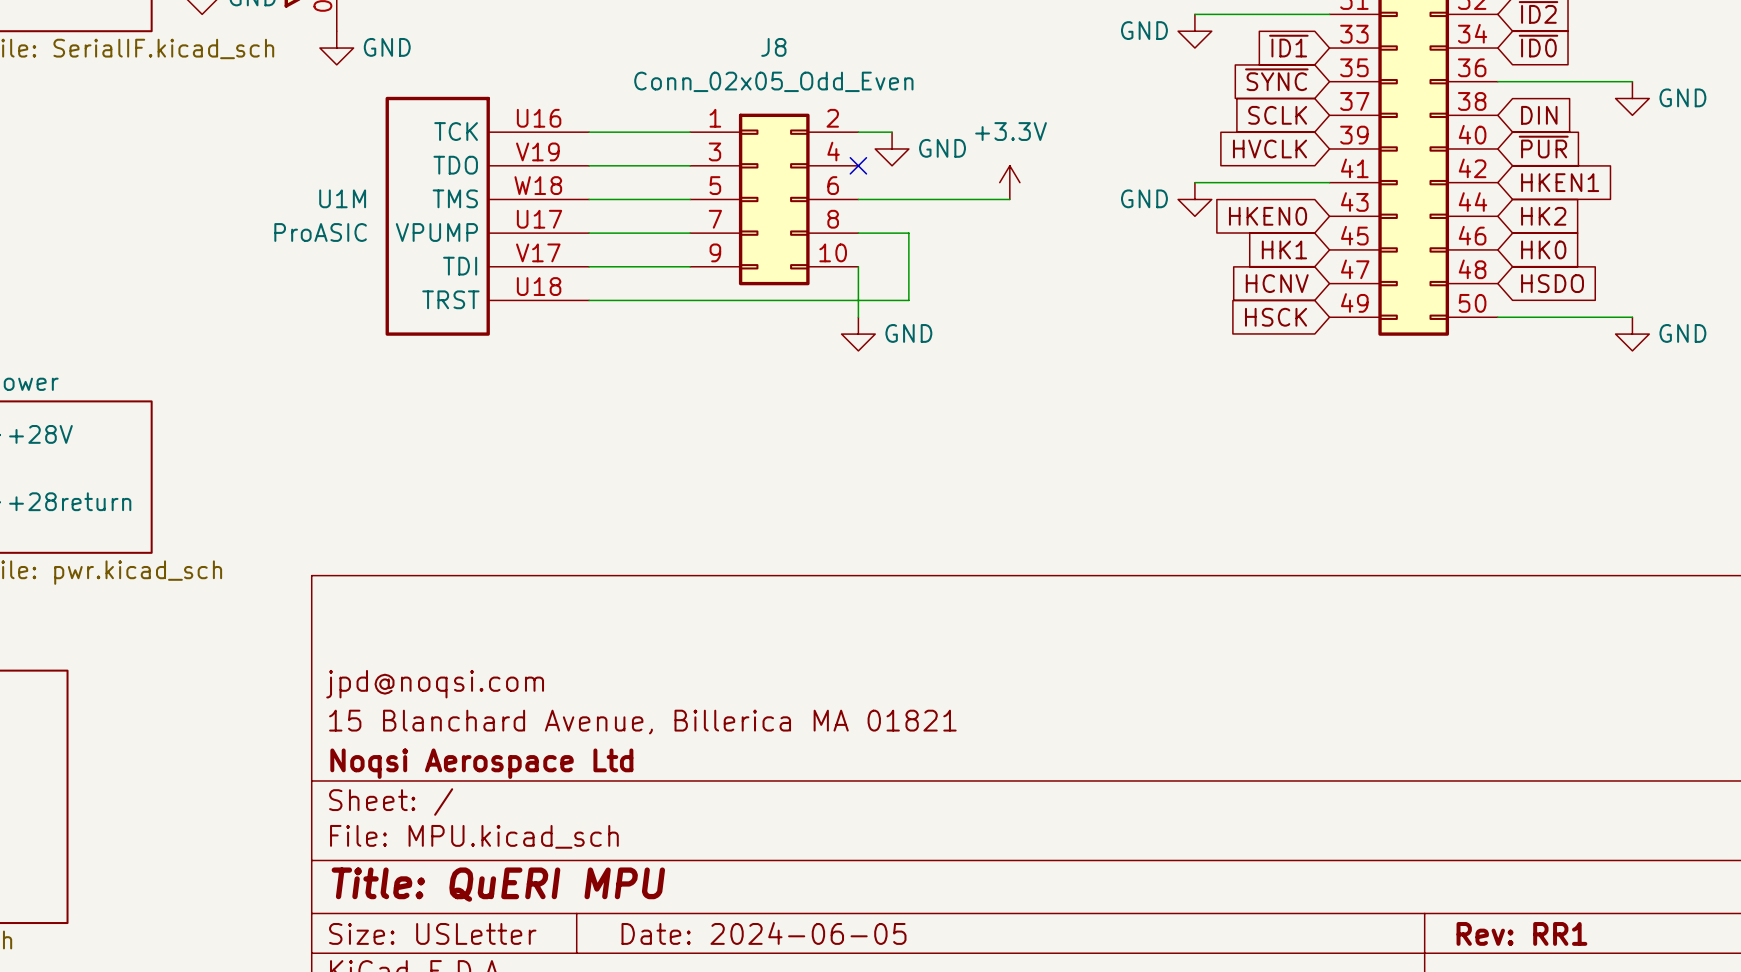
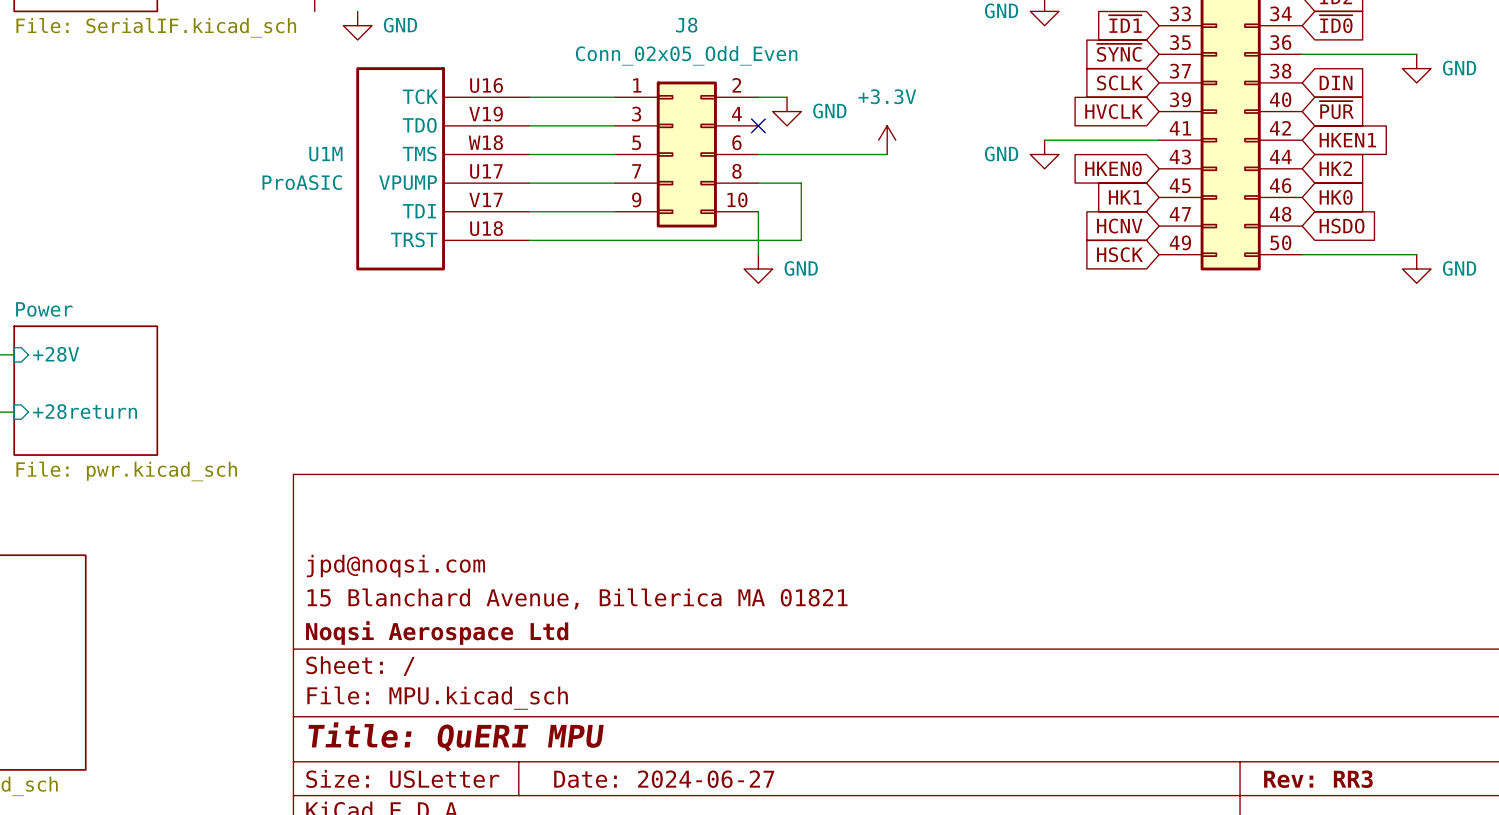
power symbol position: GND (336, 48) -> GND (357, 25)
title block: Date: 2024-06-05 (764, 933) -> Date: 2024-06-27 (664, 779)
title block: Rev: RR1 (1521, 933) -> Rev: RR3 (1318, 779)

